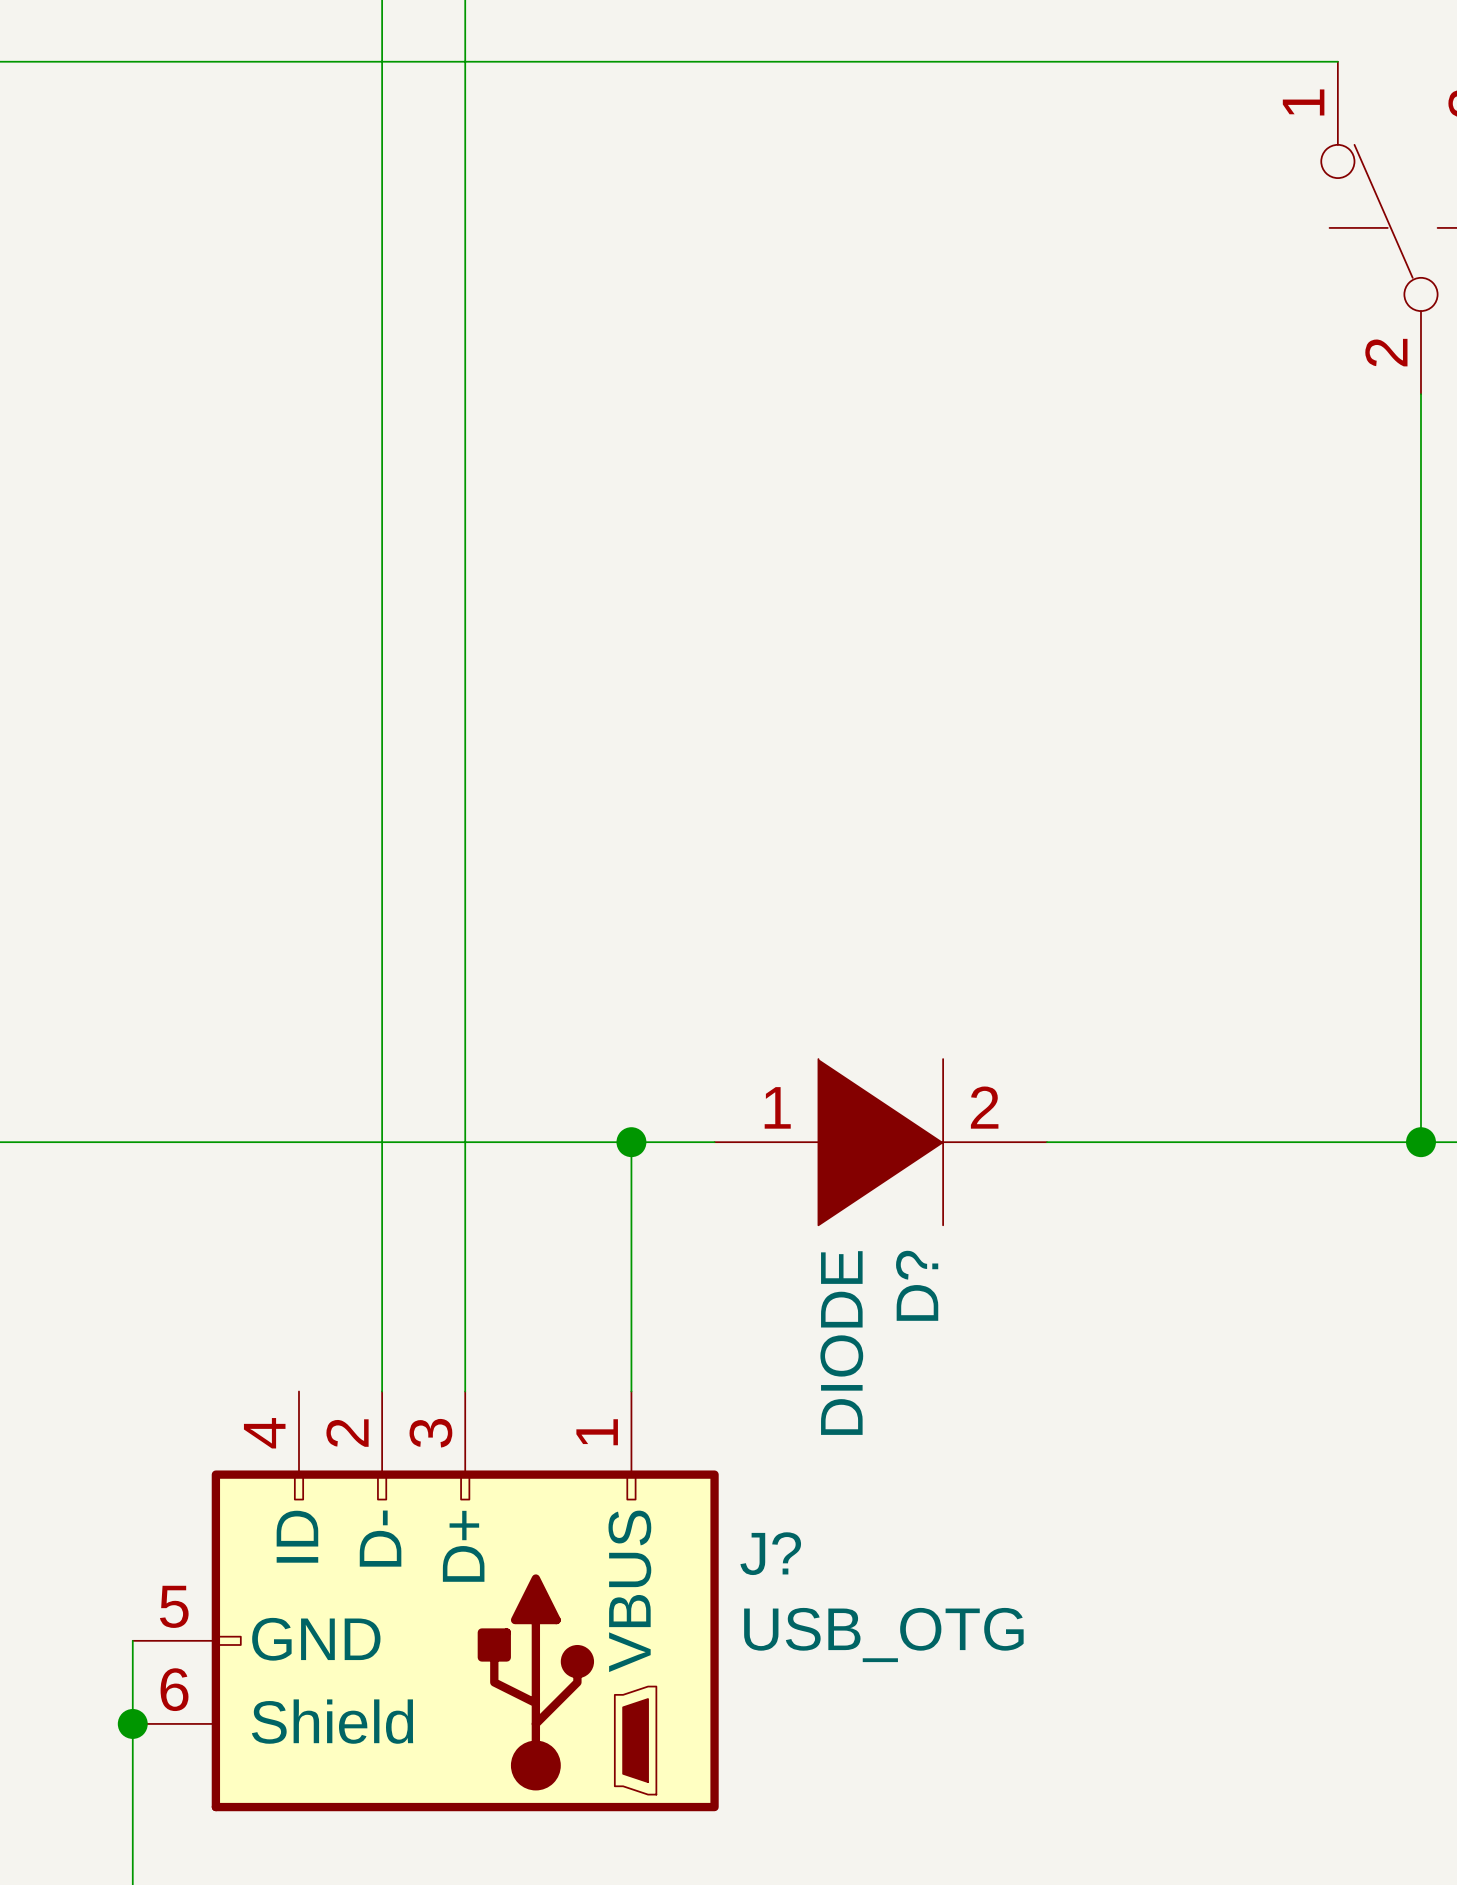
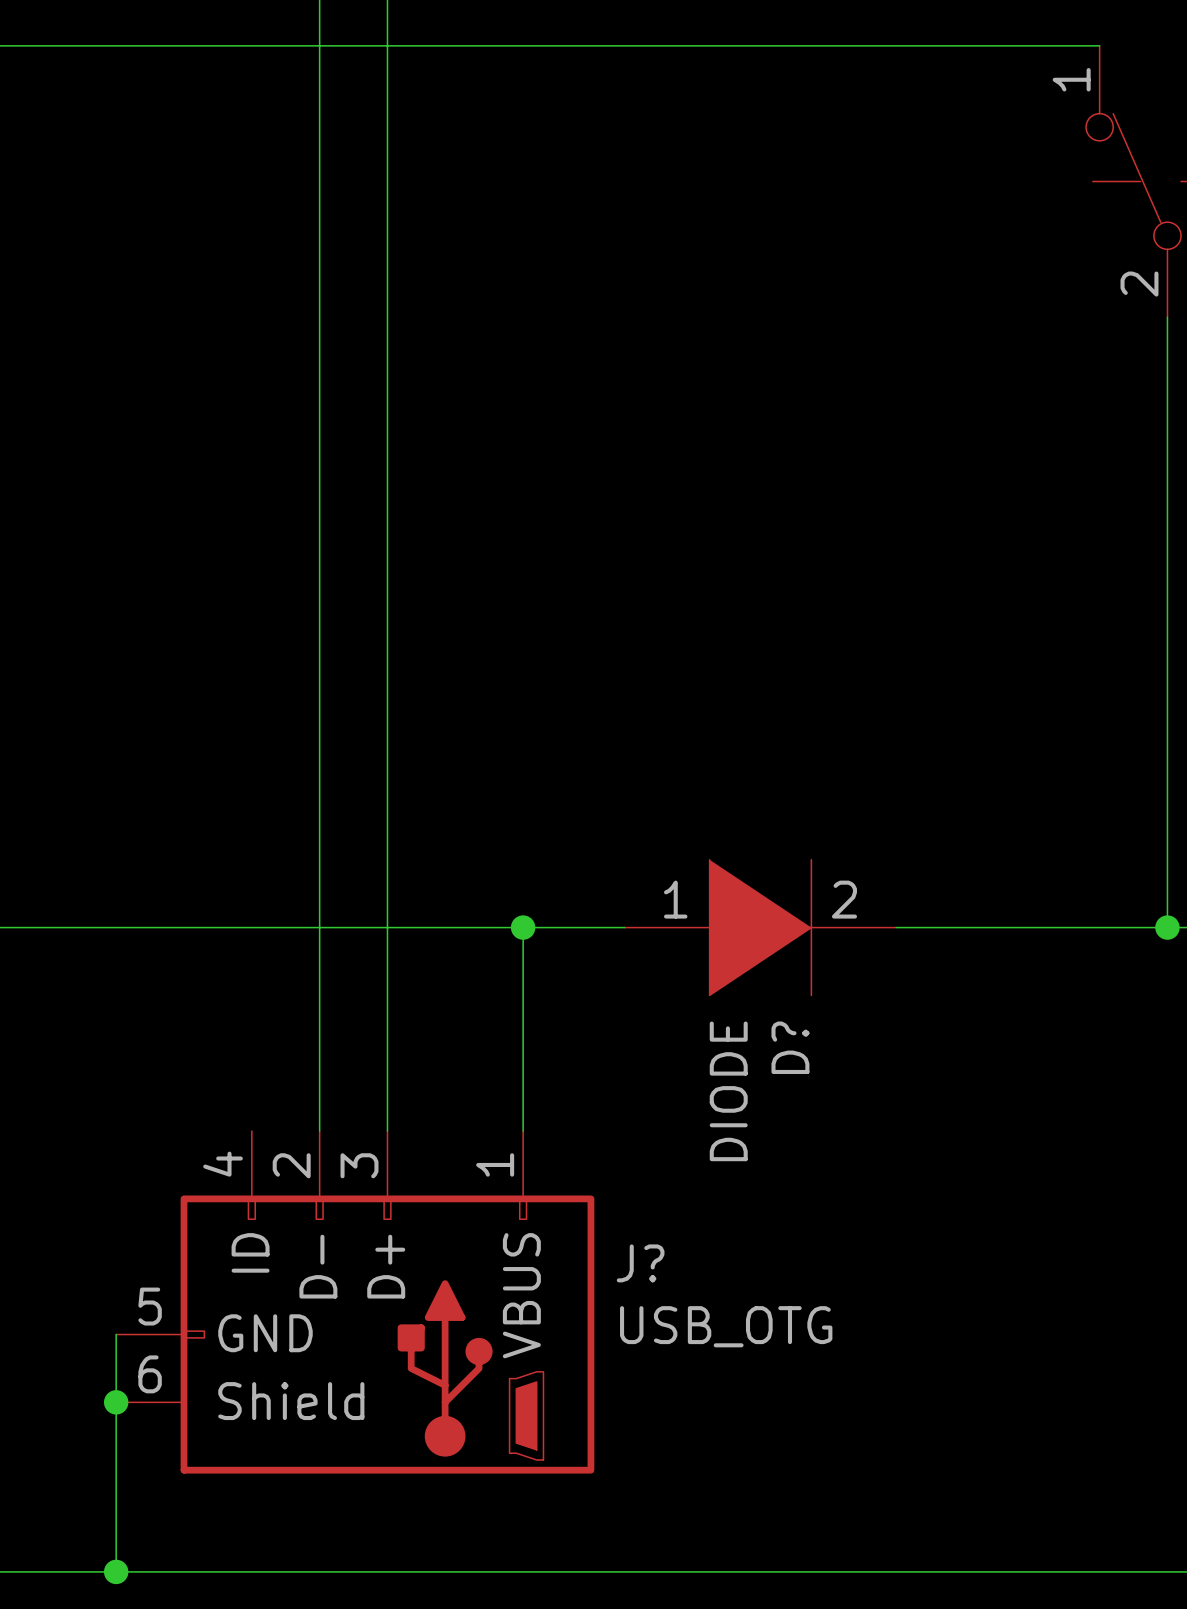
D? position: (880, 1142) -> (760, 927)

